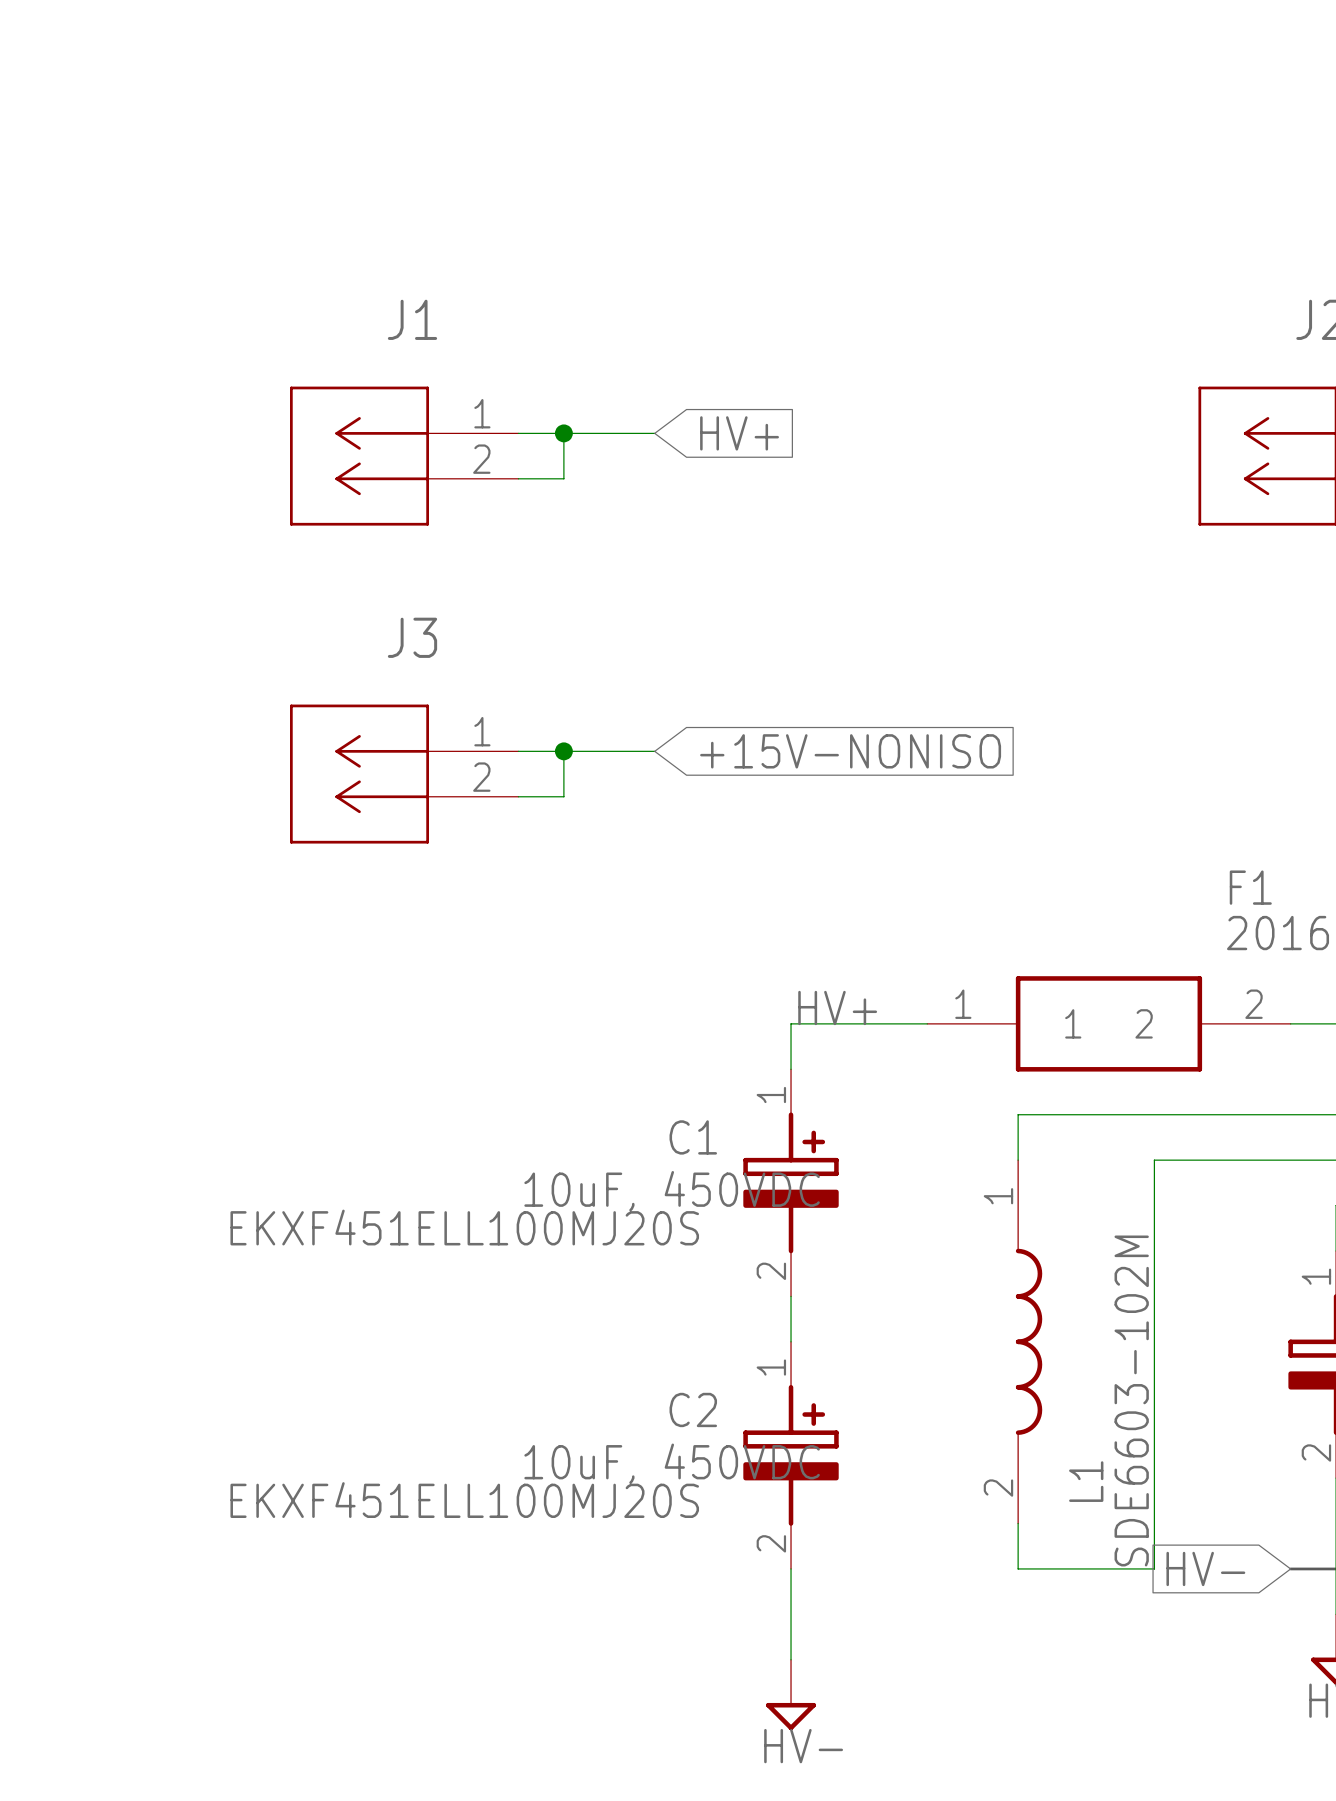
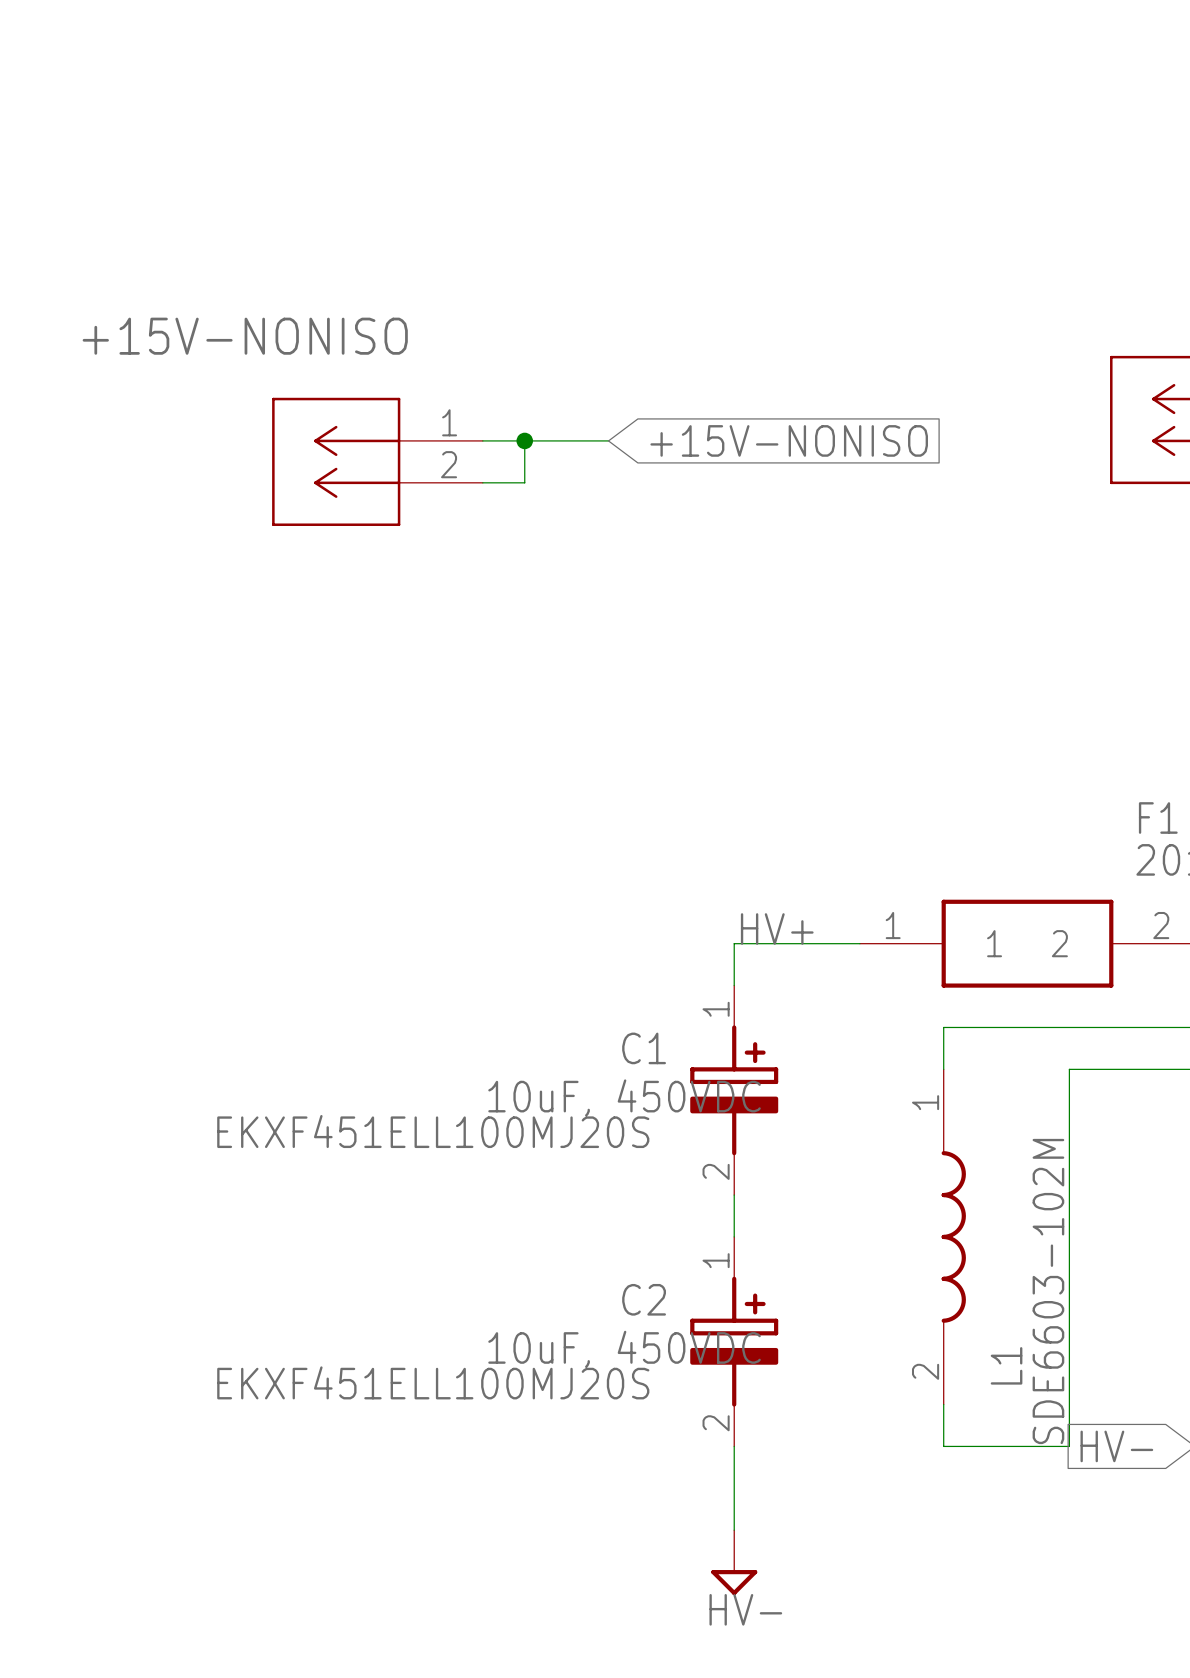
wire: (518, 433) (654, 433) -> none
wire: (563, 433) (563, 478) -> none
junction position: (563, 433) -> (524, 440)
global label: HV+ (739, 433) -> none
J1: (404, 456) -> none
wire: none -> (608, 440) (524, 440) (524, 482) (482, 482)
+15V-NONISO: none -> (377, 461)
wire: (518, 751) (654, 751) -> none
wire: (563, 751) (563, 796) (518, 796) -> none
junction: (563, 751) -> none
global label position: +15V-NONISO (850, 751) -> +15V-NONISO (789, 440)
J3: (404, 774) -> none

